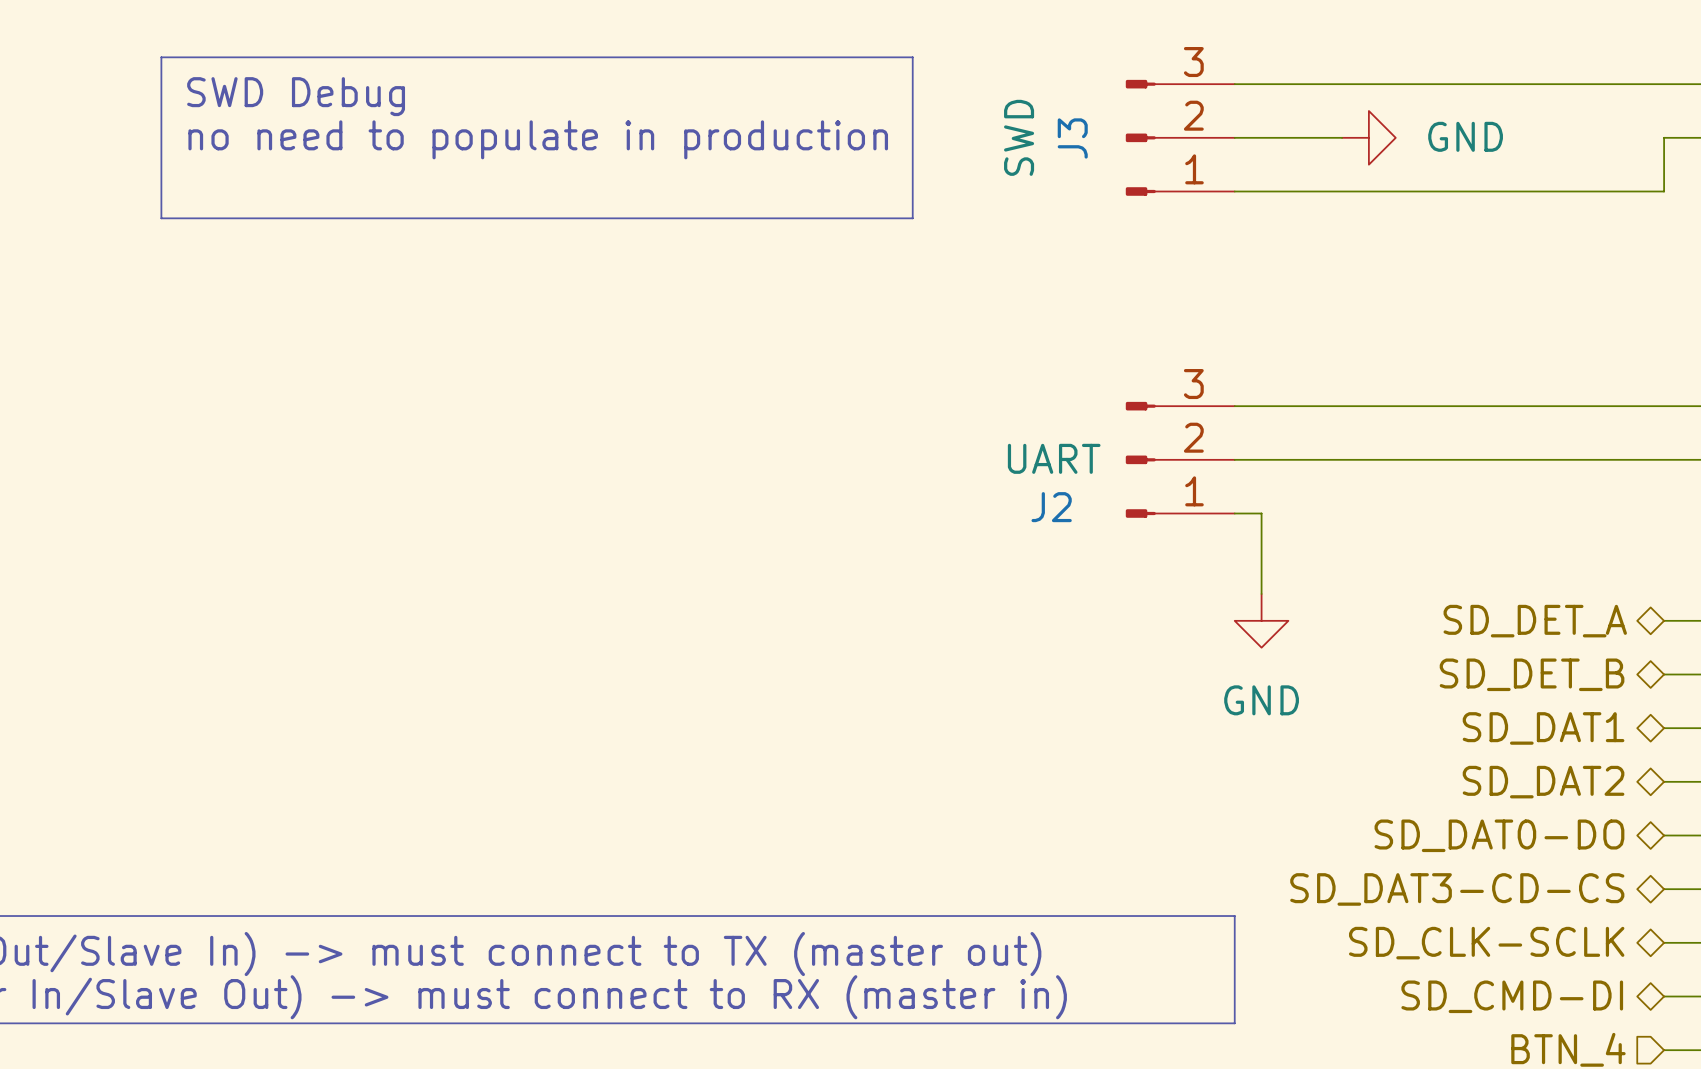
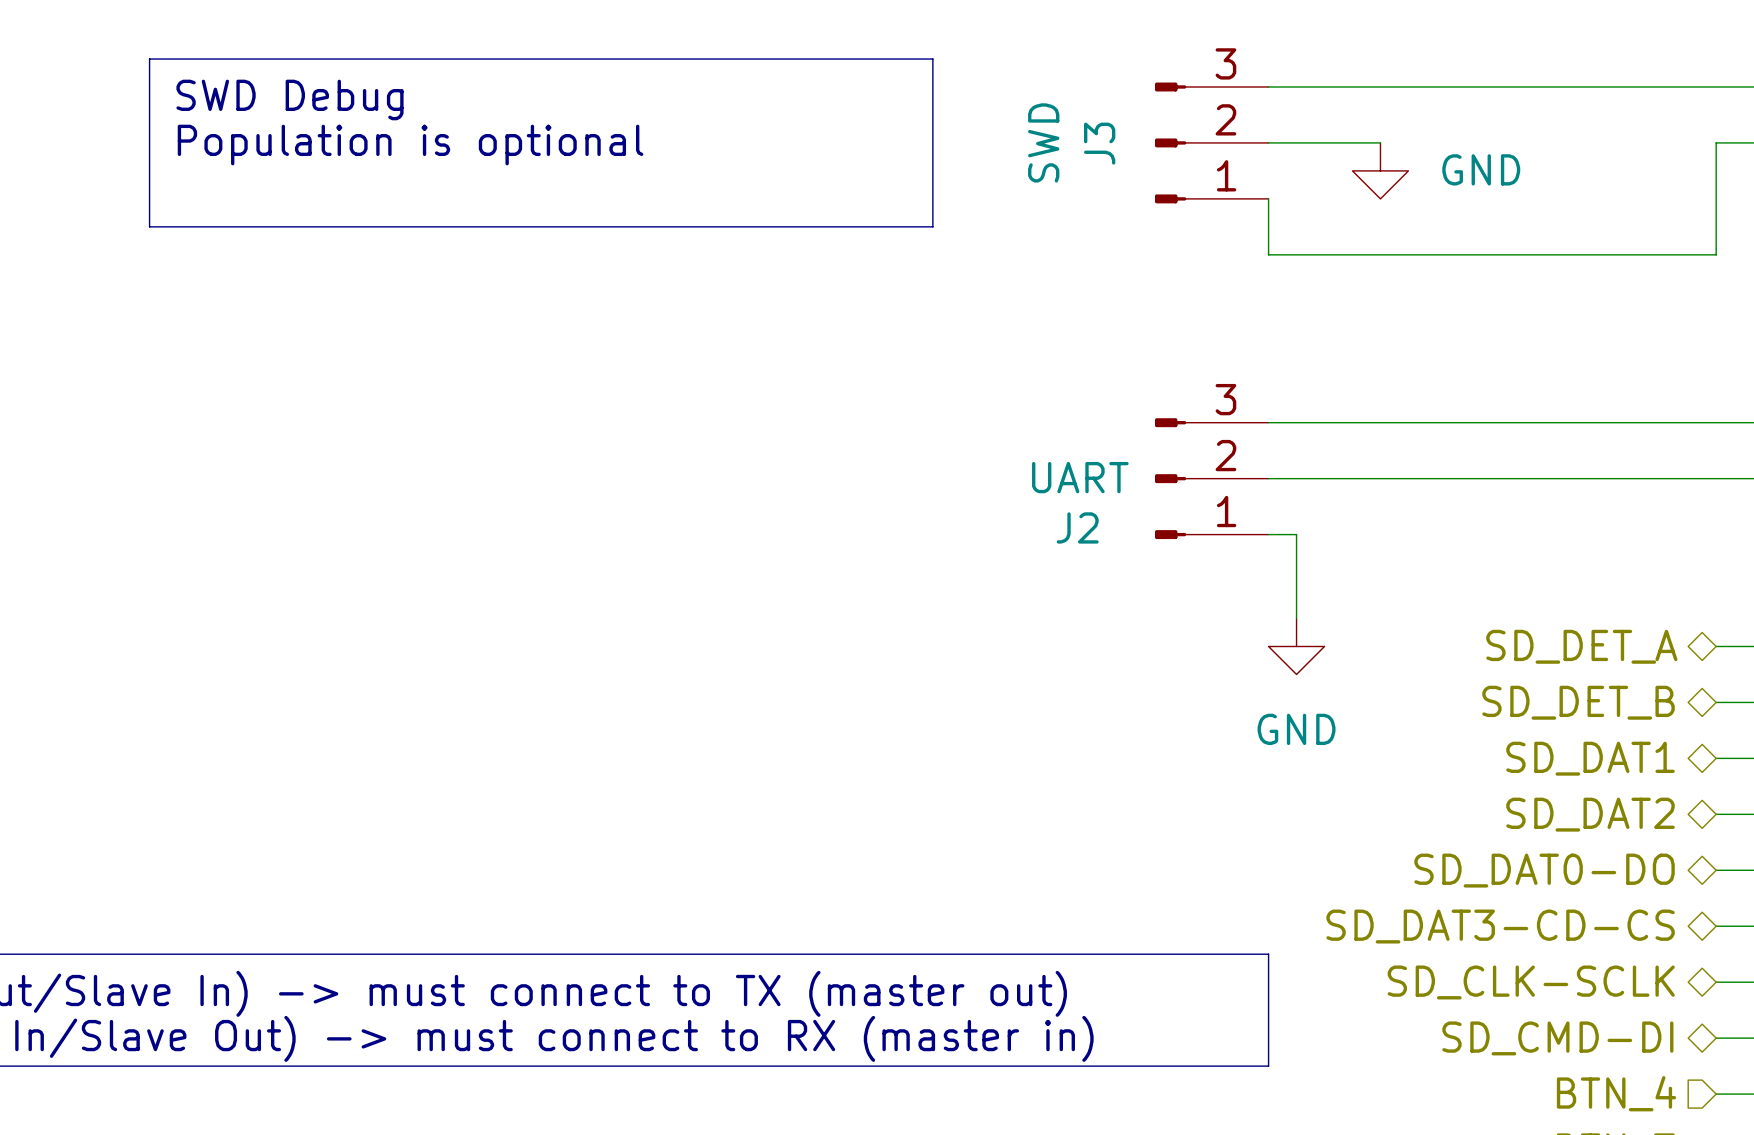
power symbol rotation: 0° (1368, 137) -> 90° clockwise (1380, 170)
power symbol position: GND (1368, 137) -> GND (1380, 170)
text: no need to populate in production (538, 139) -> Population is optional (410, 145)
wire: (1234, 191) (1664, 191) -> (1268, 198) (1268, 254) (1716, 254) (1716, 198)

